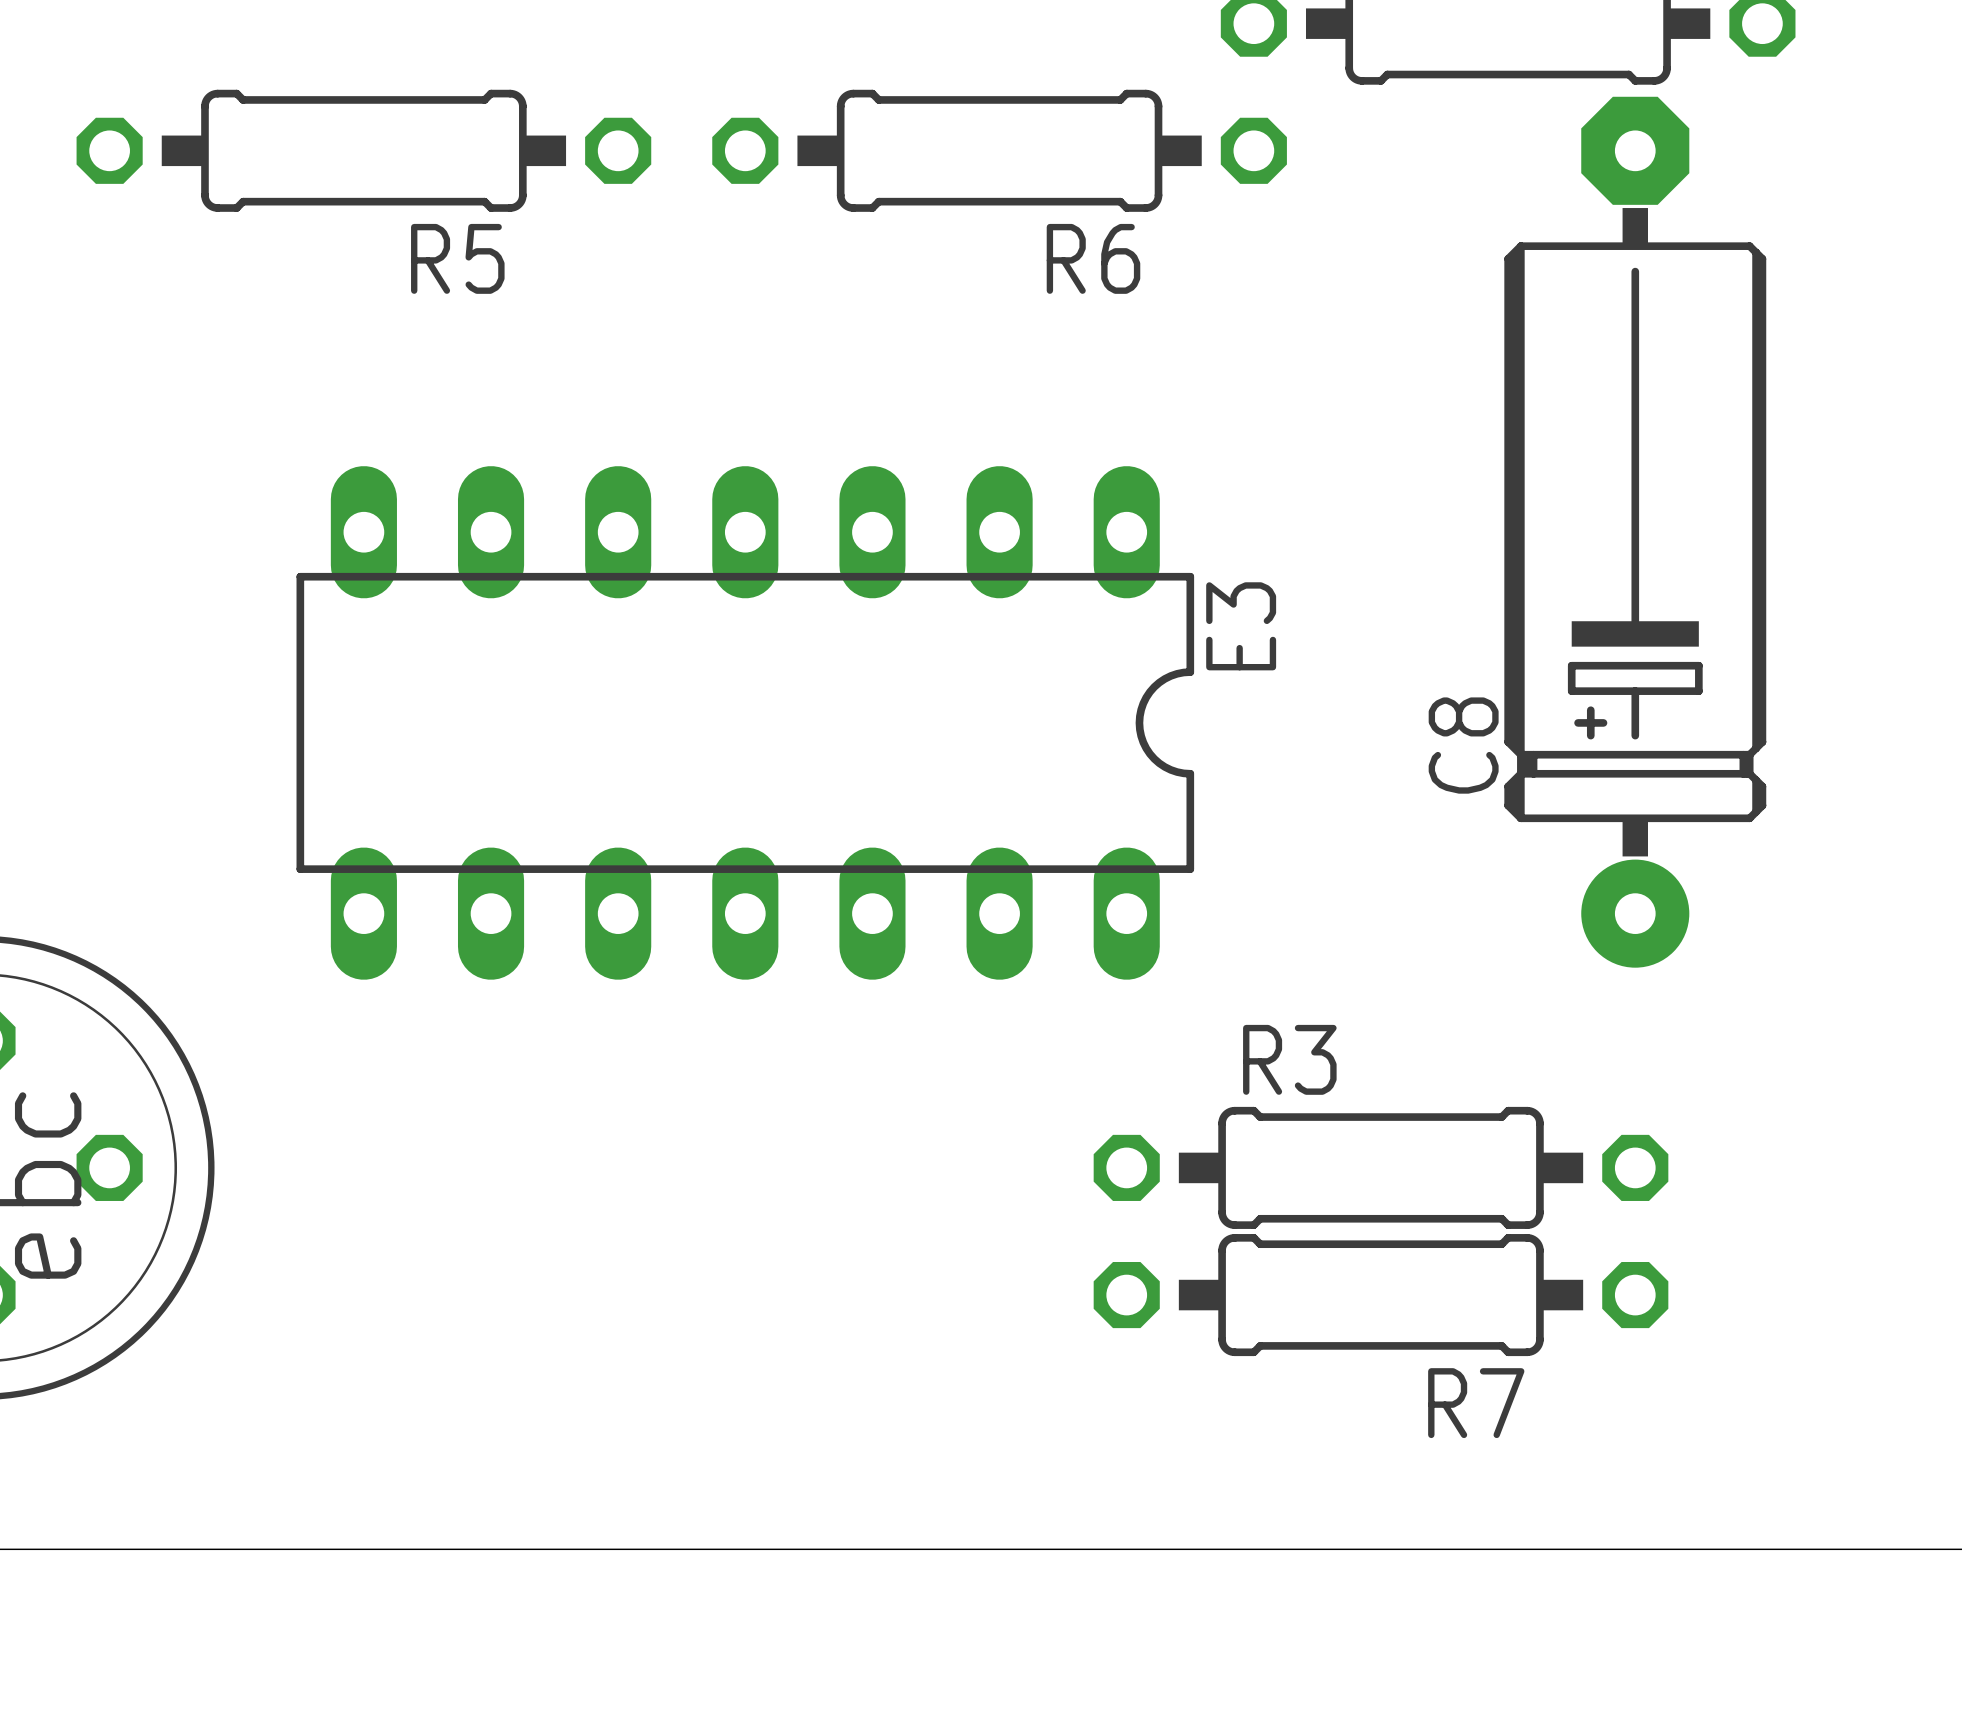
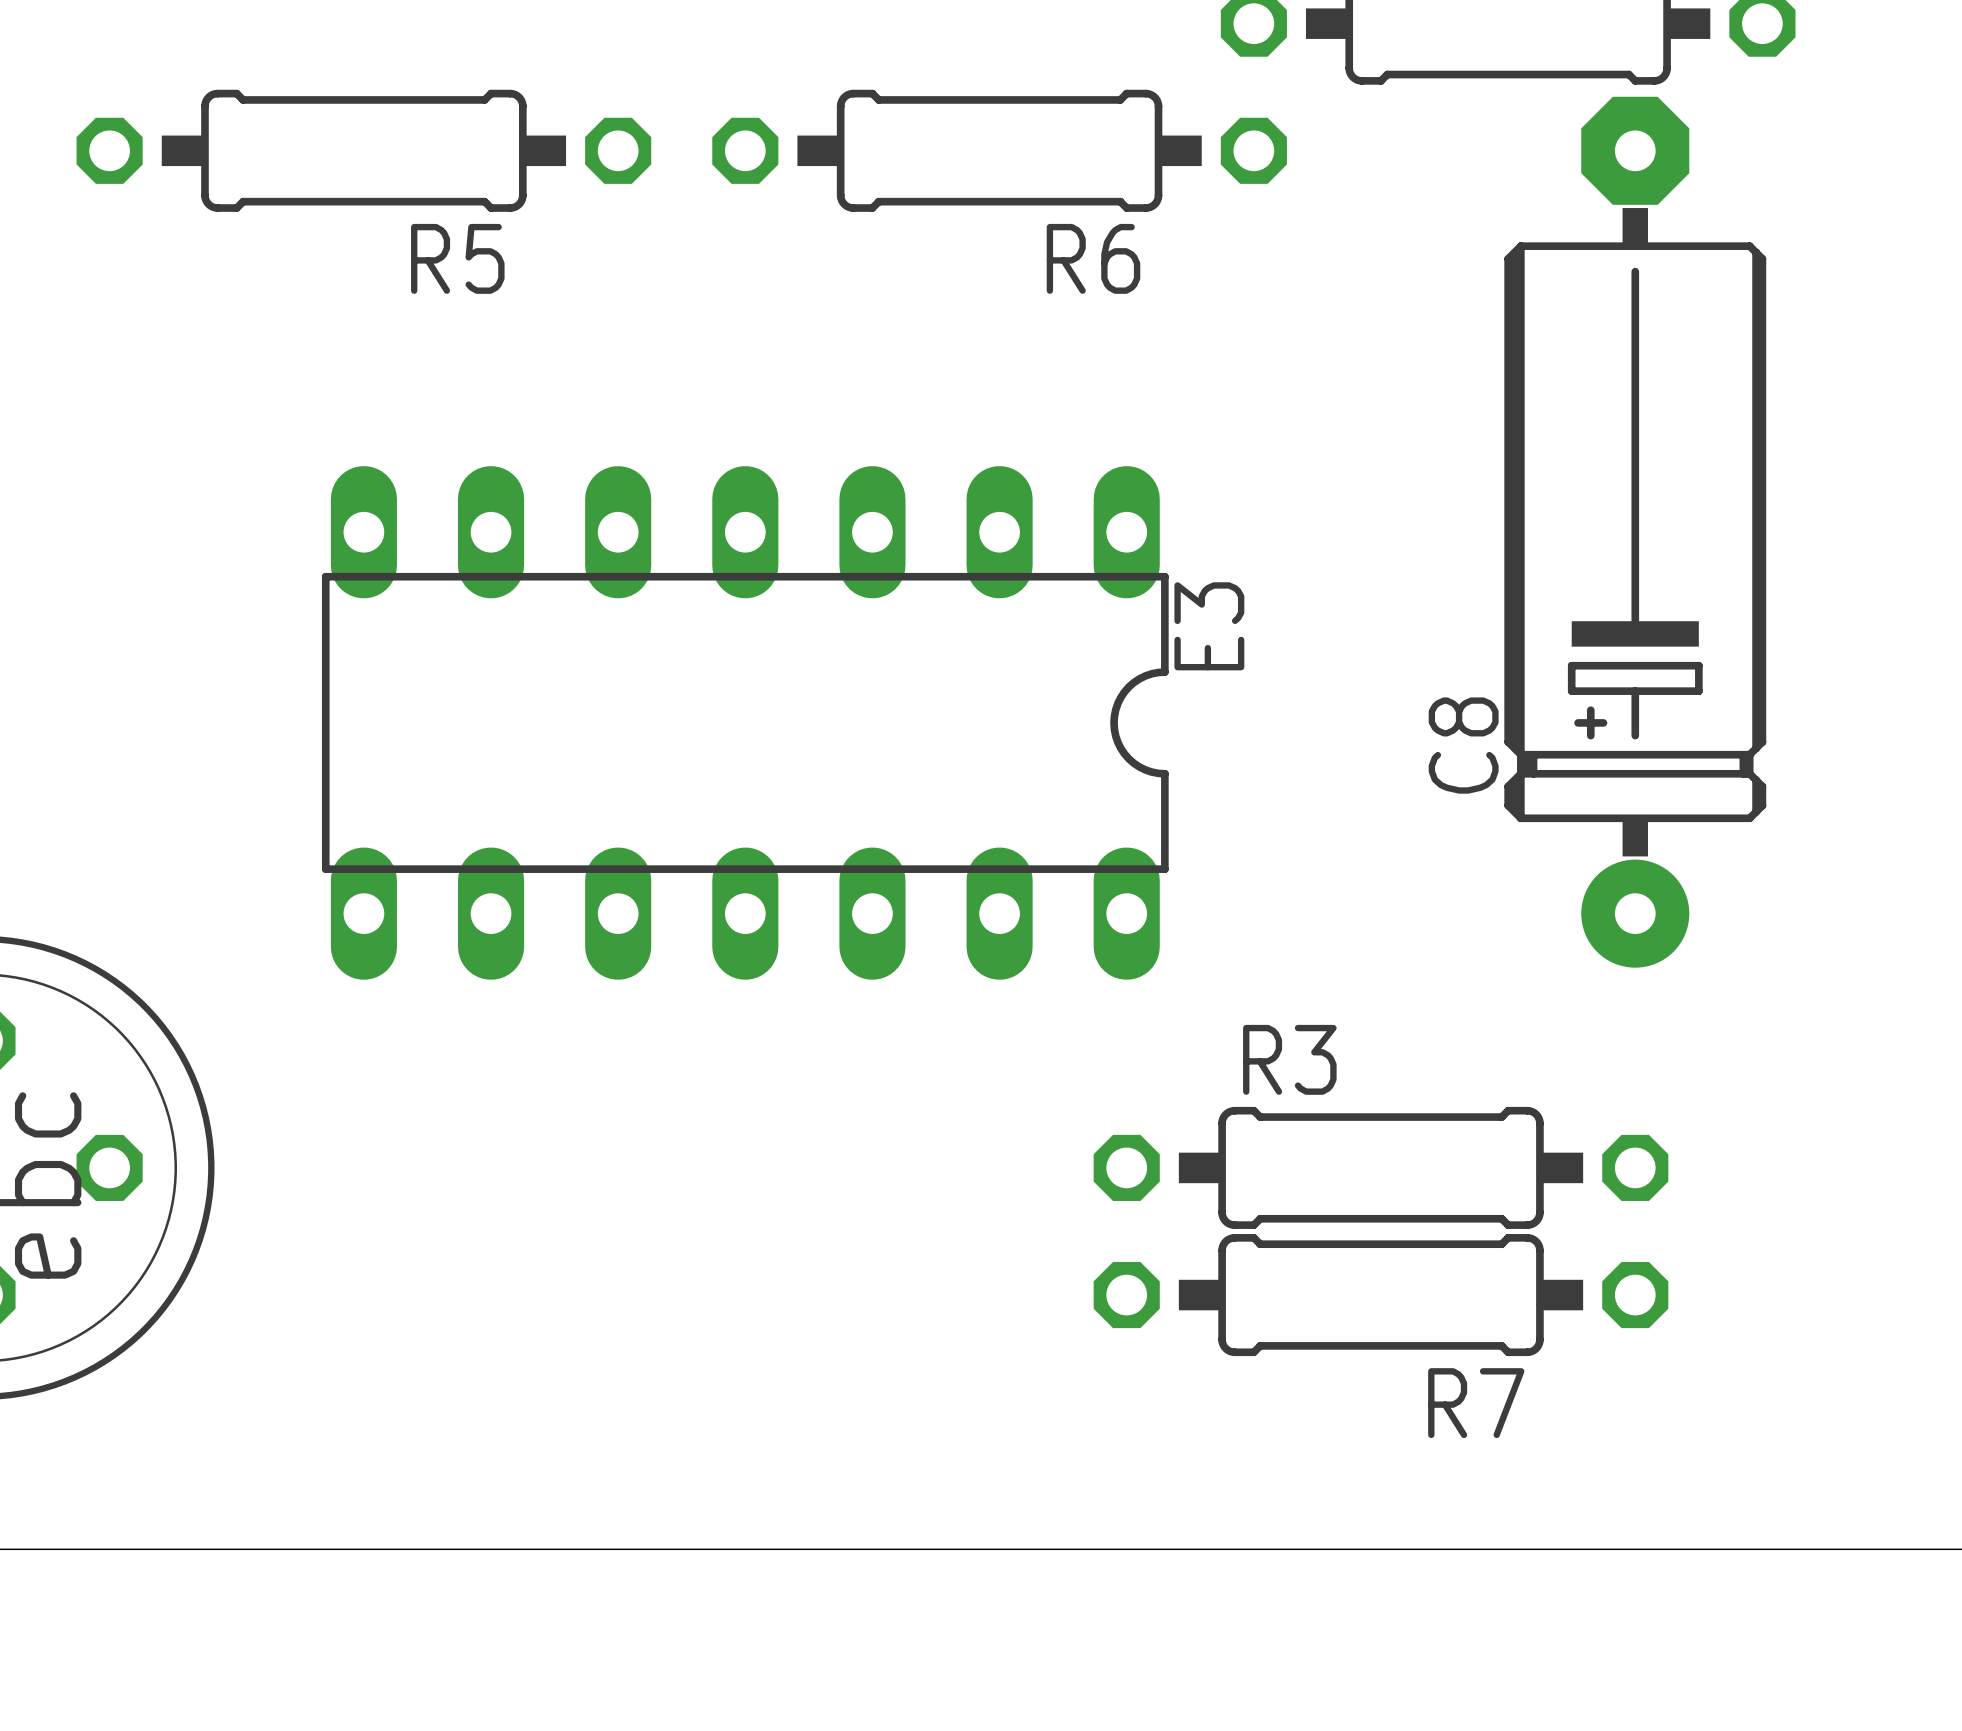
E3 footprint: [296, 466, 1195, 980] -> [321, 466, 1169, 980]
E3 name position: E3 (1241, 626) -> E3 (1209, 626)

